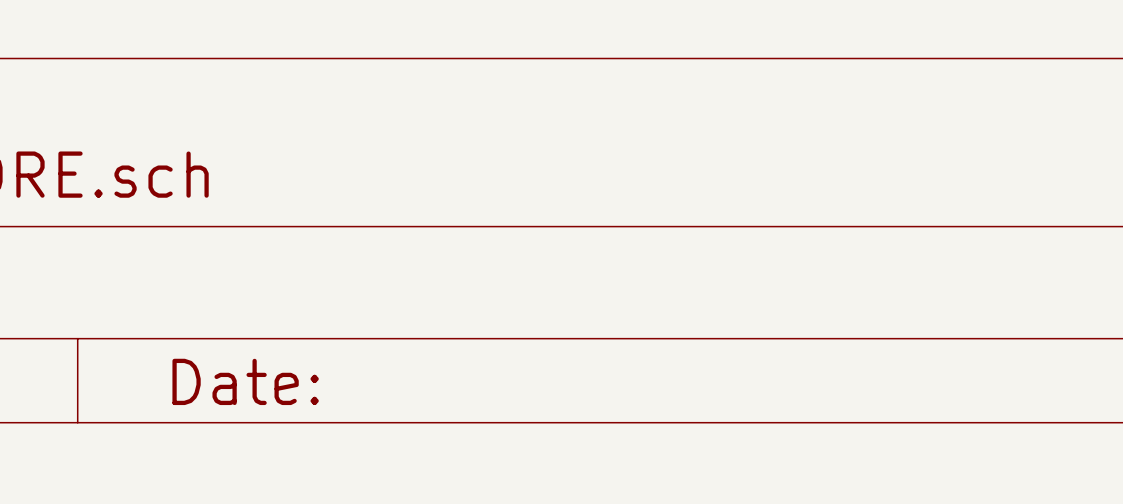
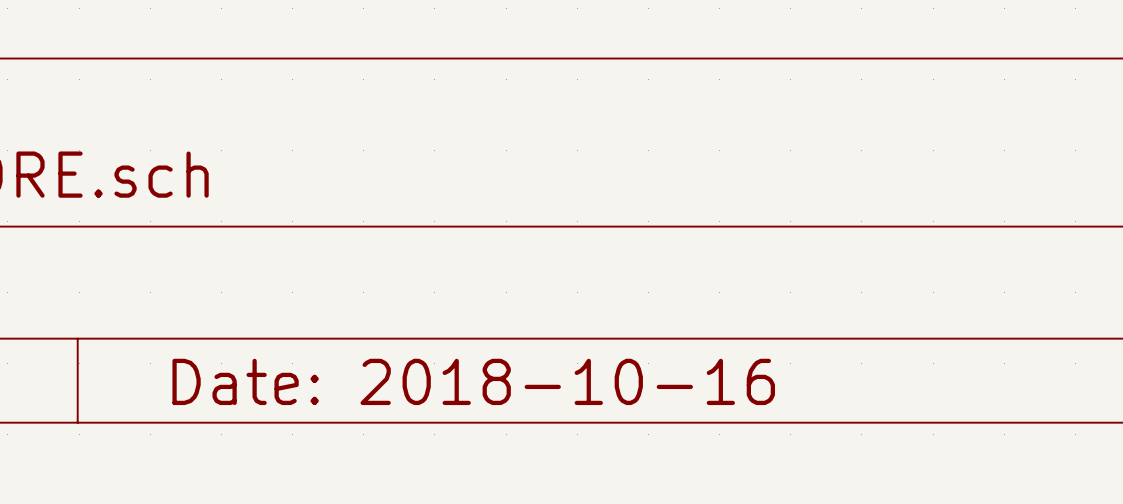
title block: Date: (245, 381) -> Date: 2018-10-16 (473, 381)

